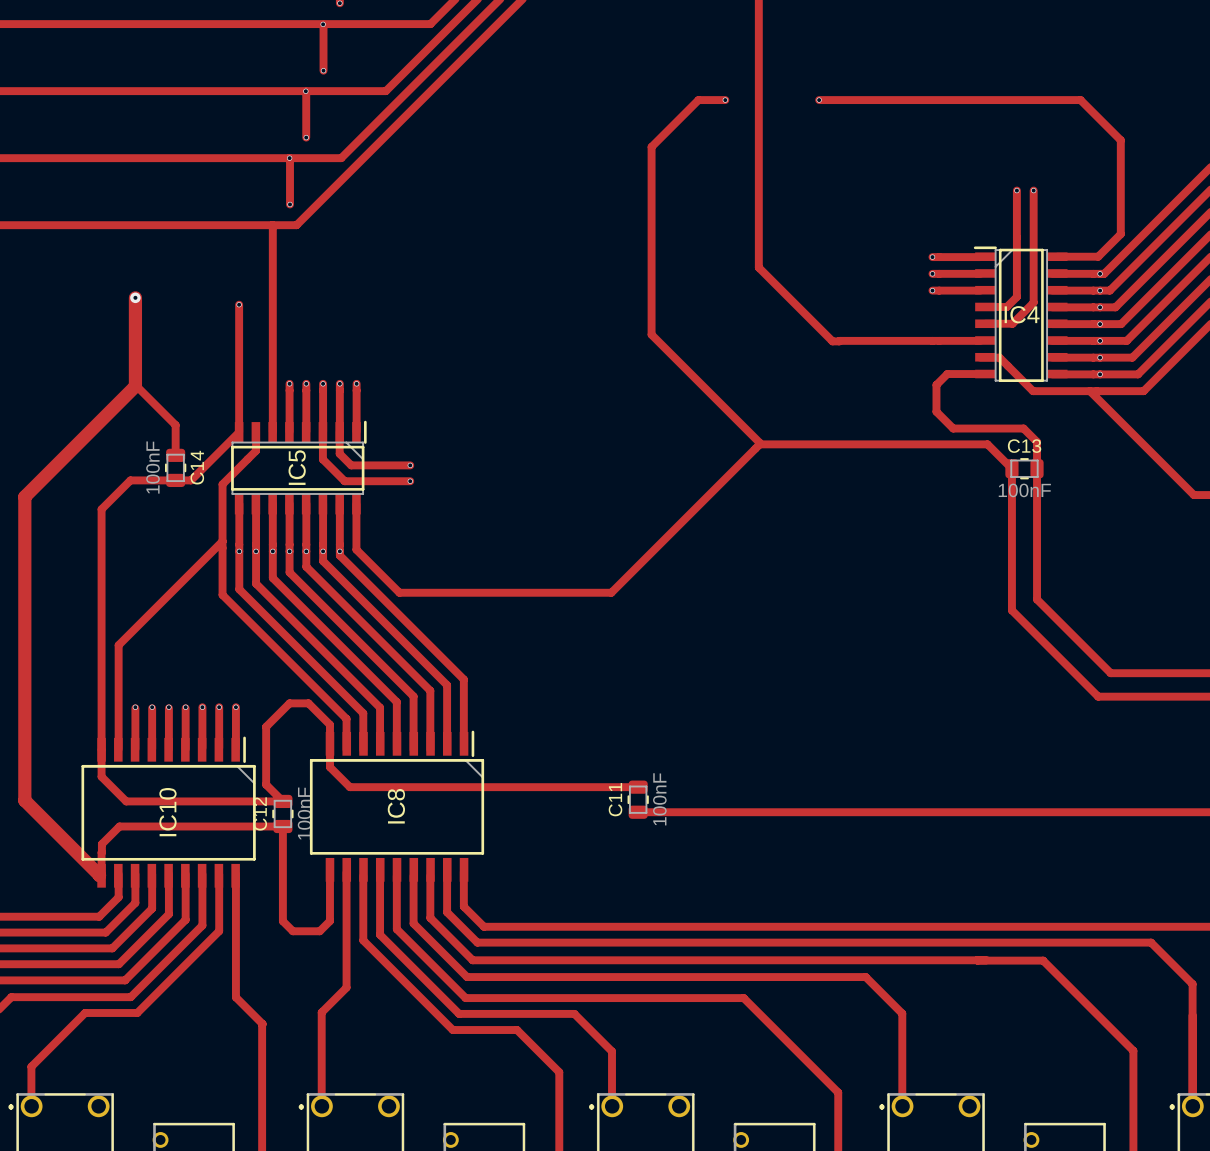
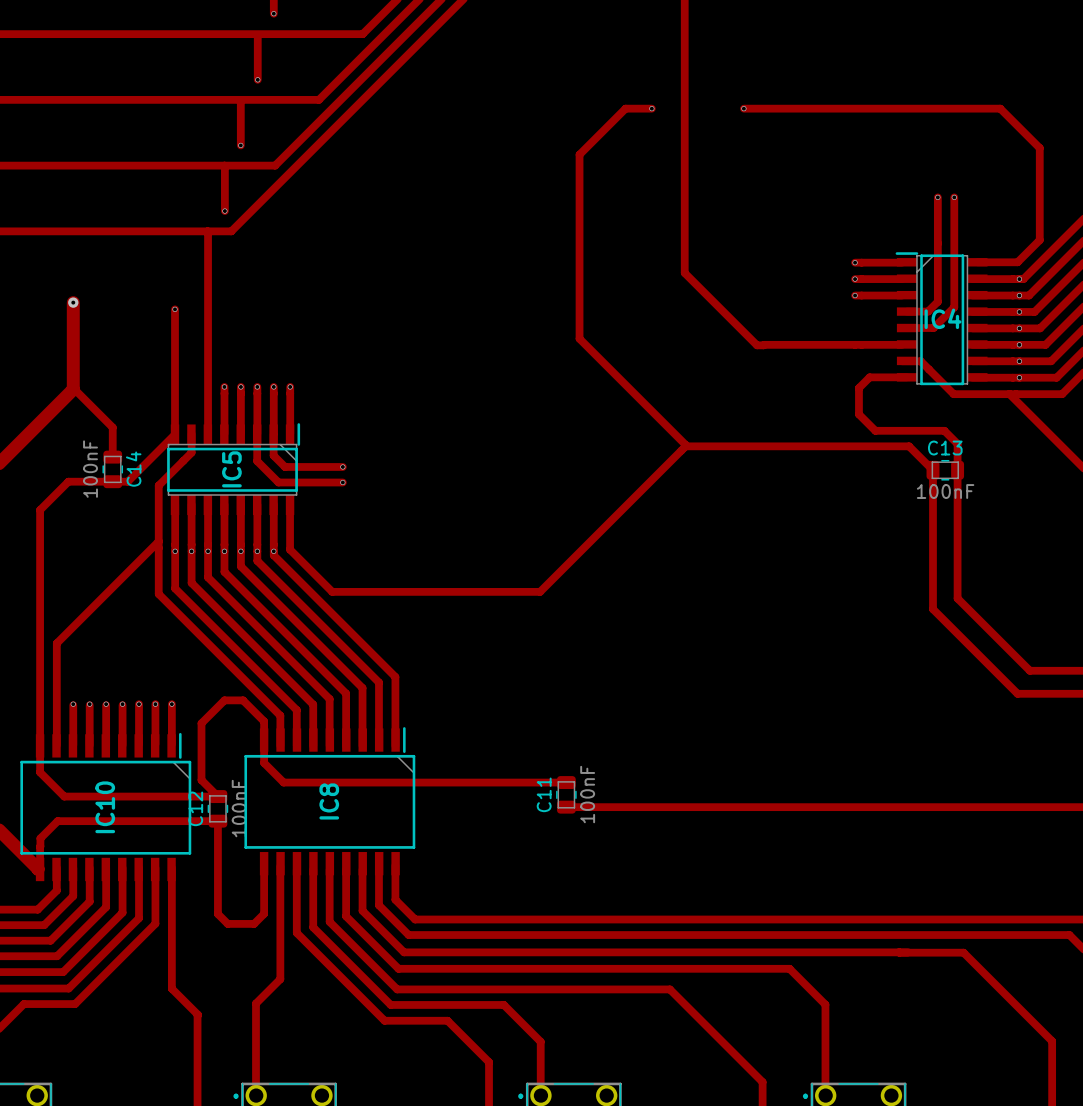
via: (323, 24) -> none
via: (305, 91) -> none
via: (289, 158) -> none

